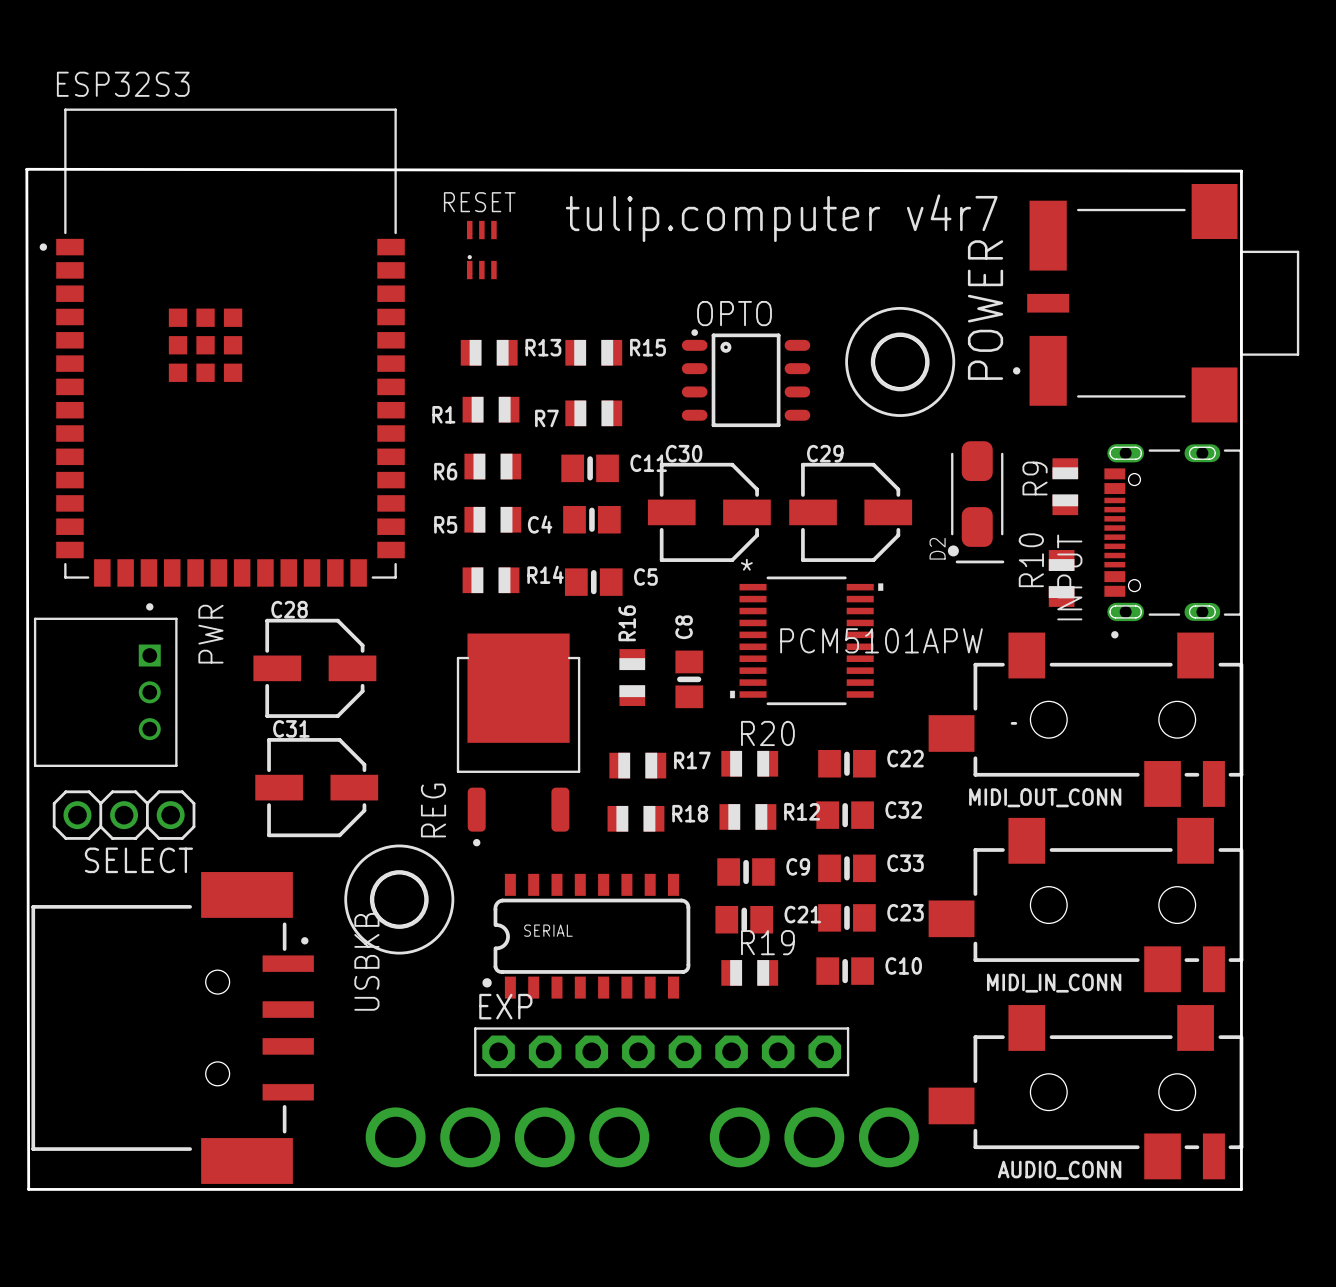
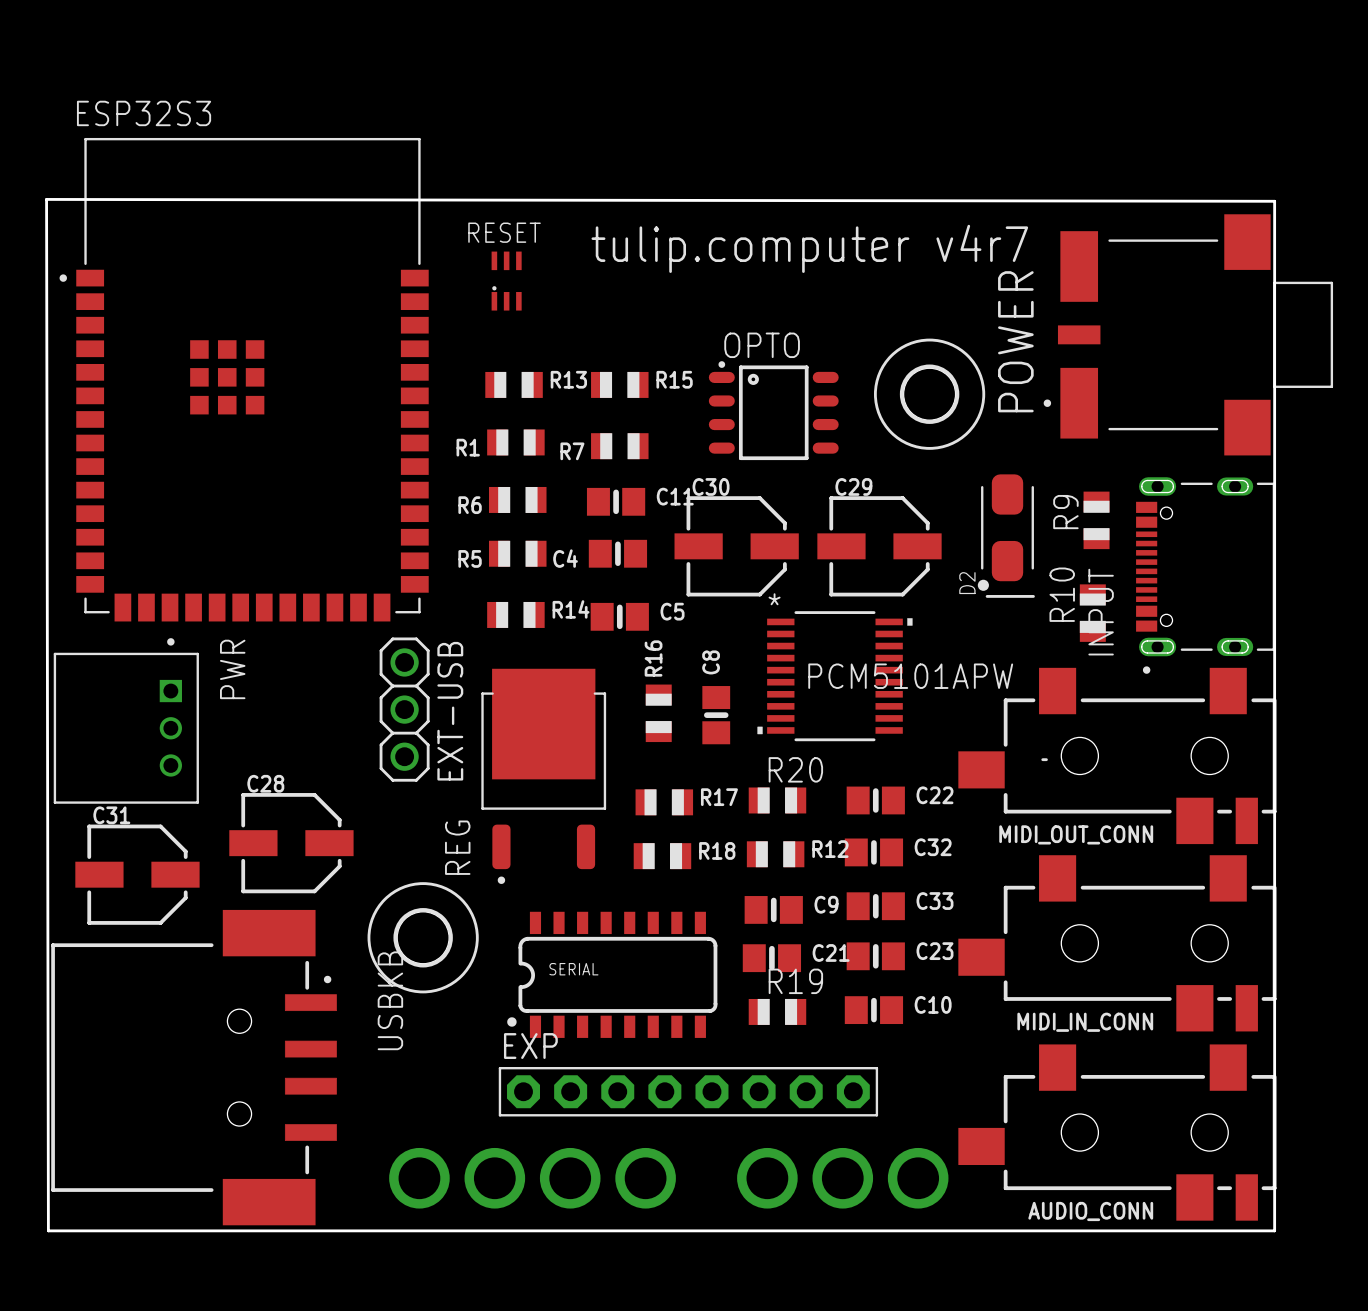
C28 position: (314, 668) -> (291, 843)
EXT-USB: none -> (404, 709)
C31 position: (316, 787) -> (137, 874)
SELECT: (124, 815) -> none

